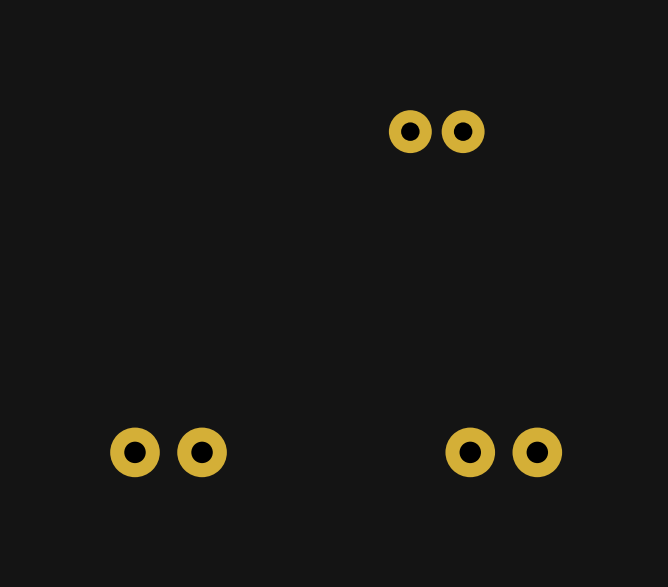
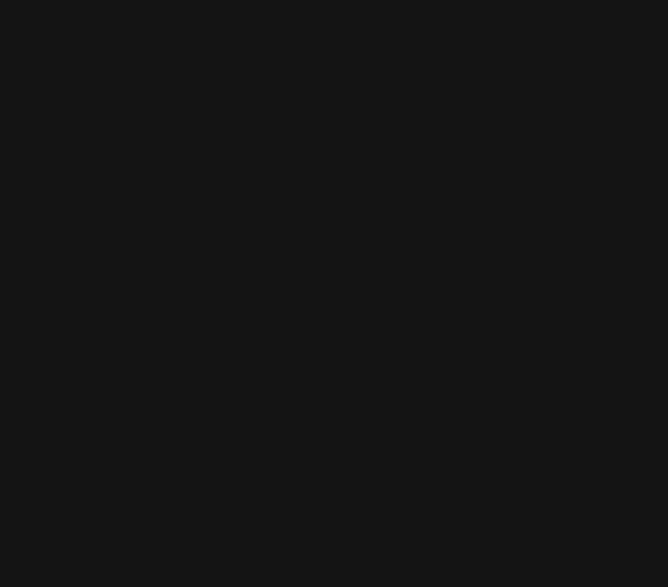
part: (436, 131) -> none
part: (168, 452) -> none
part: (503, 452) -> none

